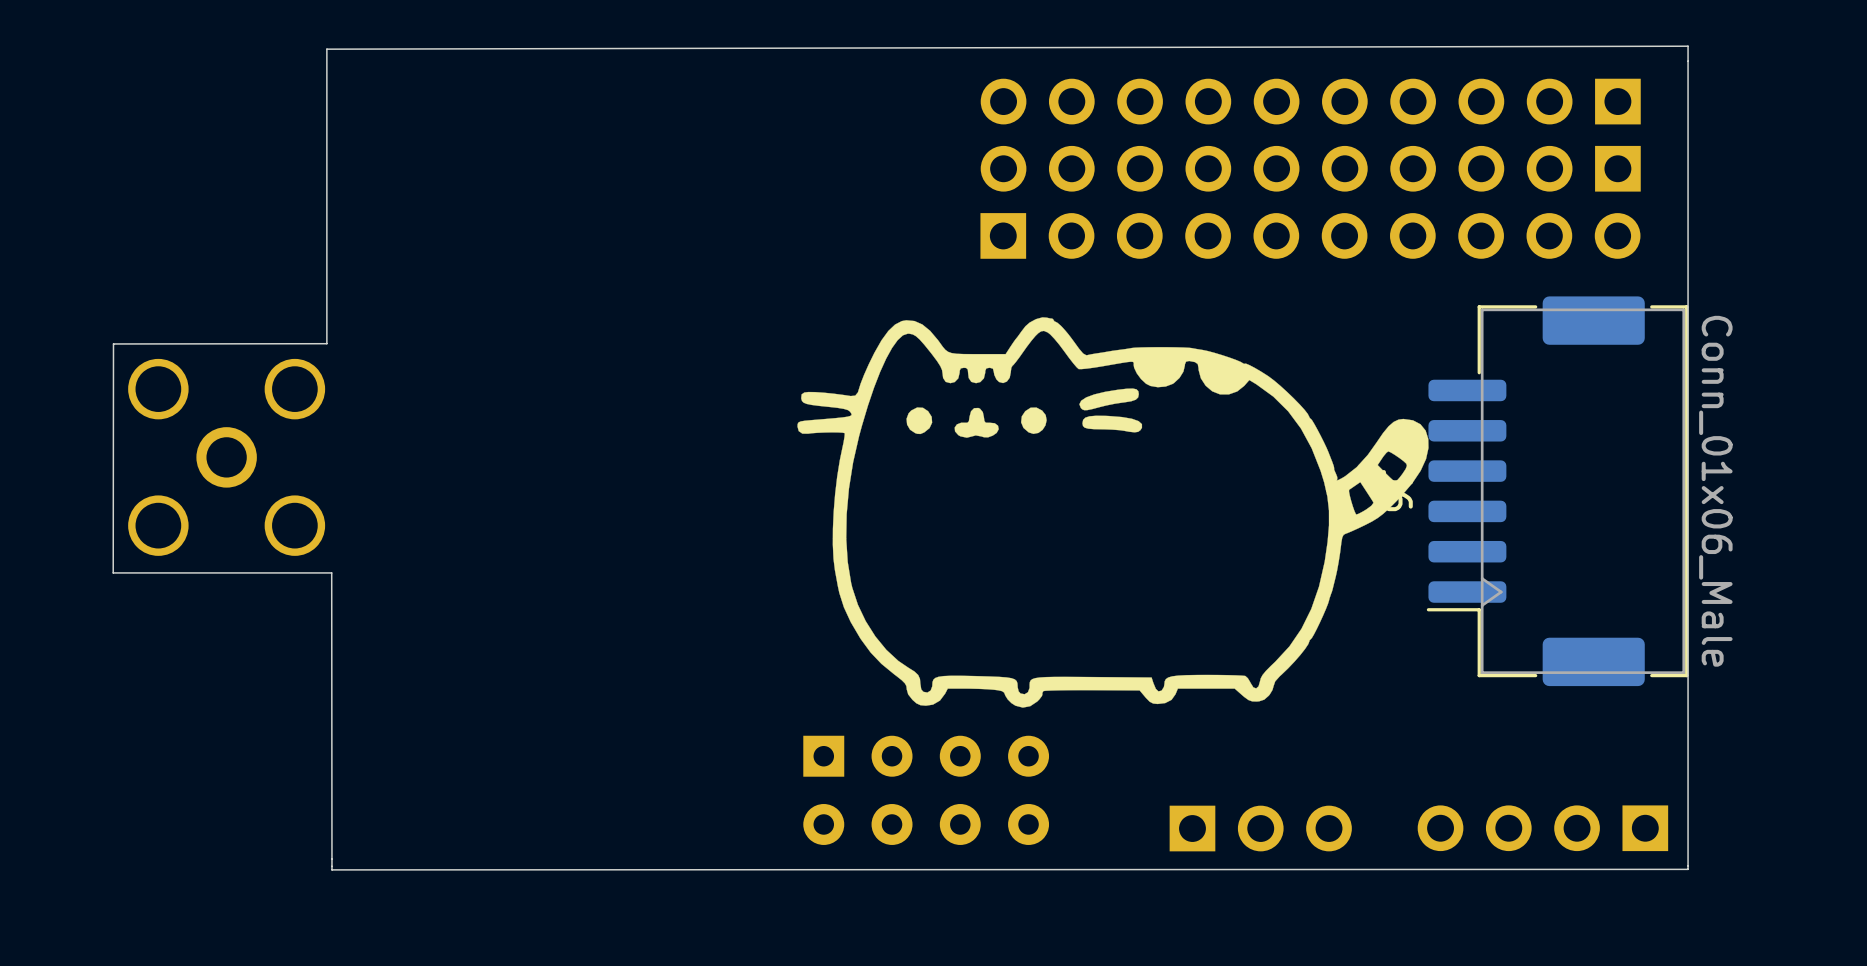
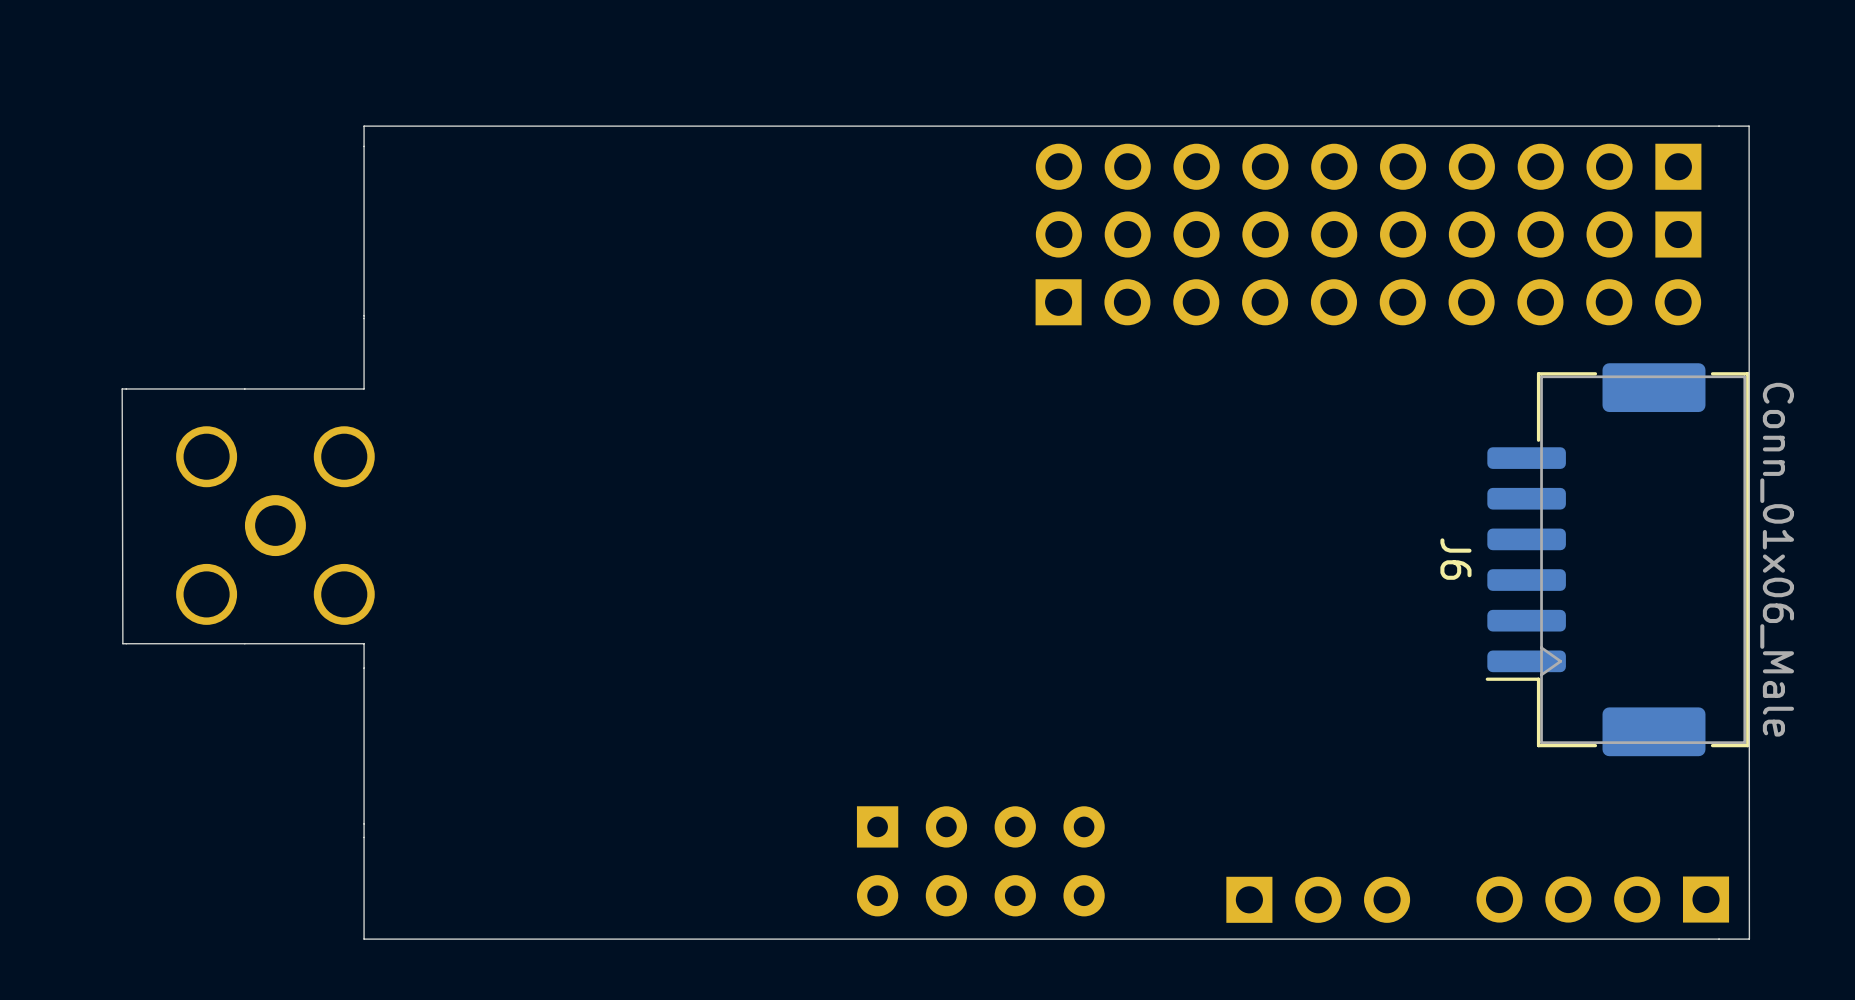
board edge: (1688, 46) (1688, 869) (331, 869) (331, 572) (113, 572) (113, 343) (326, 343) (326, 49) (1688, 46) -> (1749, 126) (1749, 939) (364, 939) (364, 643) (122, 643) (122, 388) (364, 388) (364, 126) (1749, 126)
drawing: [797, 317, 1429, 708] -> none

